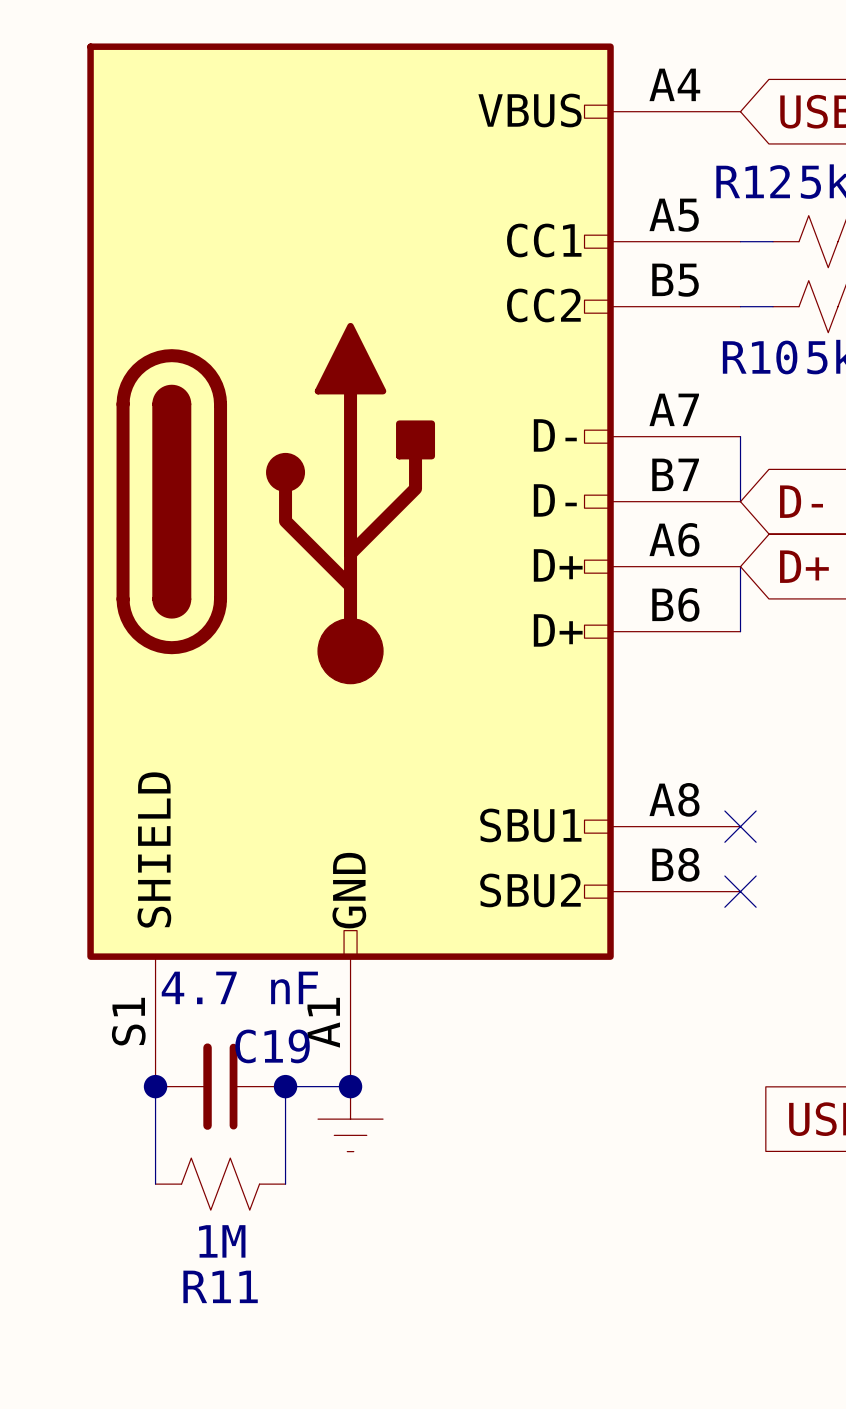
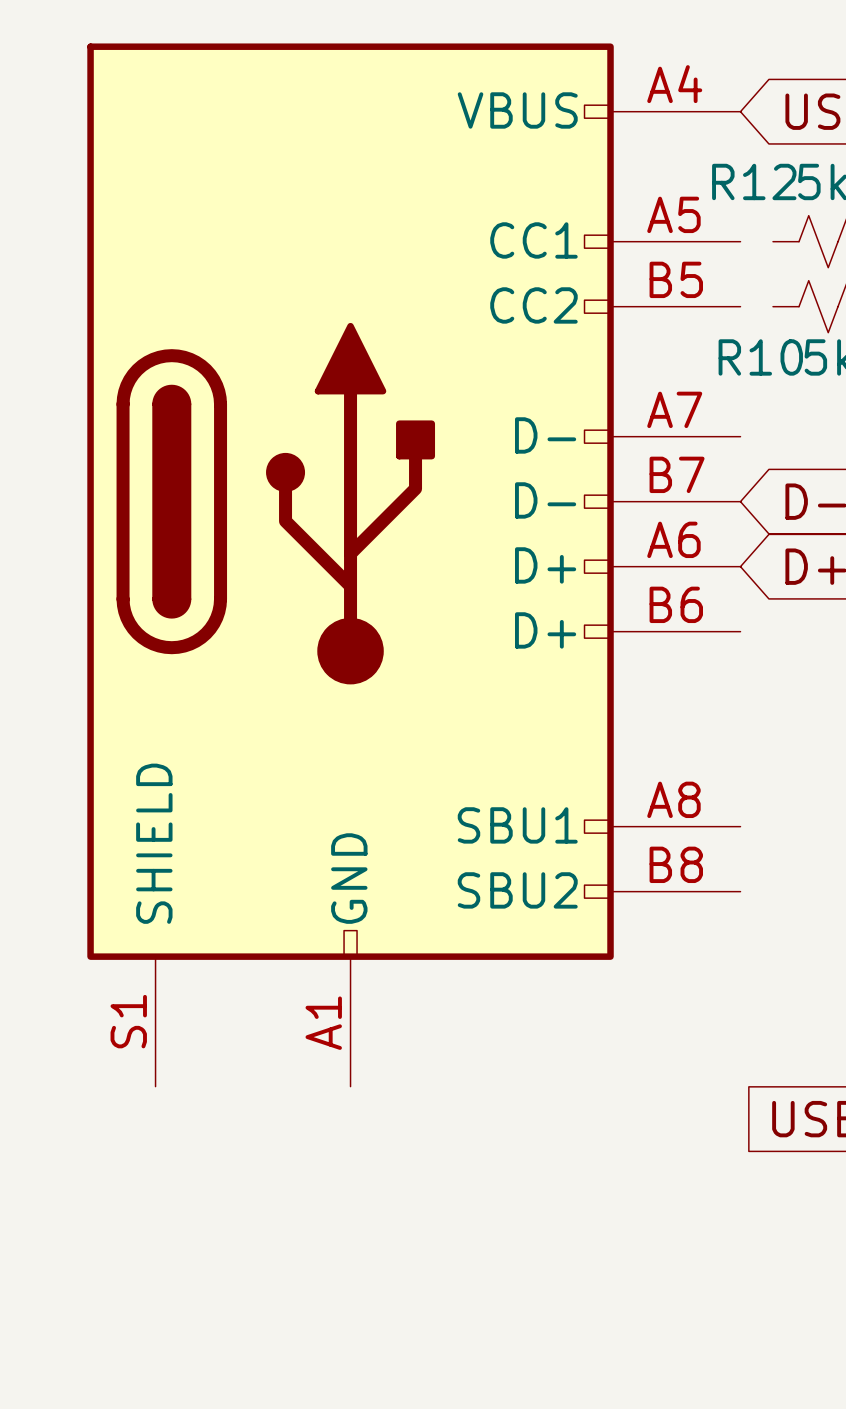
wire: (740, 241) (773, 241) -> none
wire: (740, 306) (773, 306) -> none
wire: (740, 436) (740, 501) -> none
wire: (740, 566) (740, 631) -> none
no-connect mark: (740, 826) -> none
no-connect mark: (740, 891) -> none
wire: (155, 1086) (155, 1184) -> none
junction: (155, 1086) -> none
C19: 4.7 nF (220, 1086) -> none
junction: (285, 1086) -> none
wire: (350, 1086) (285, 1086) (285, 1184) -> none
junction: (350, 1086) -> none
power symbol: (350, 1119) -> none
R11: 1M (220, 1184) -> none

